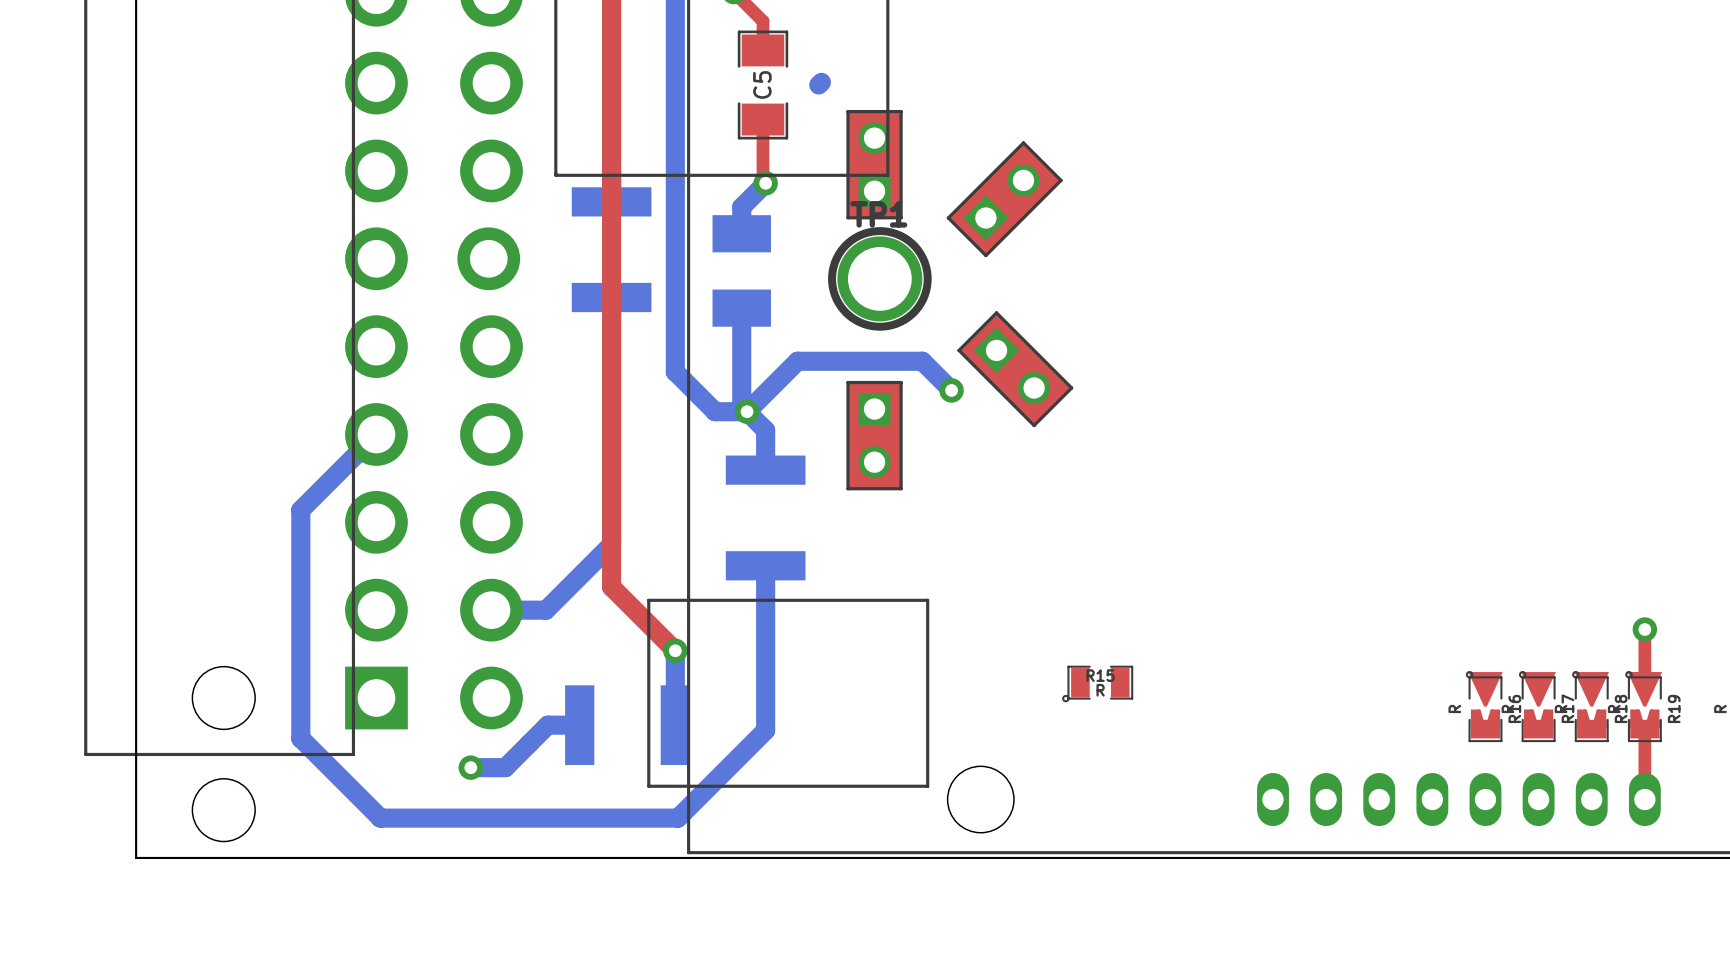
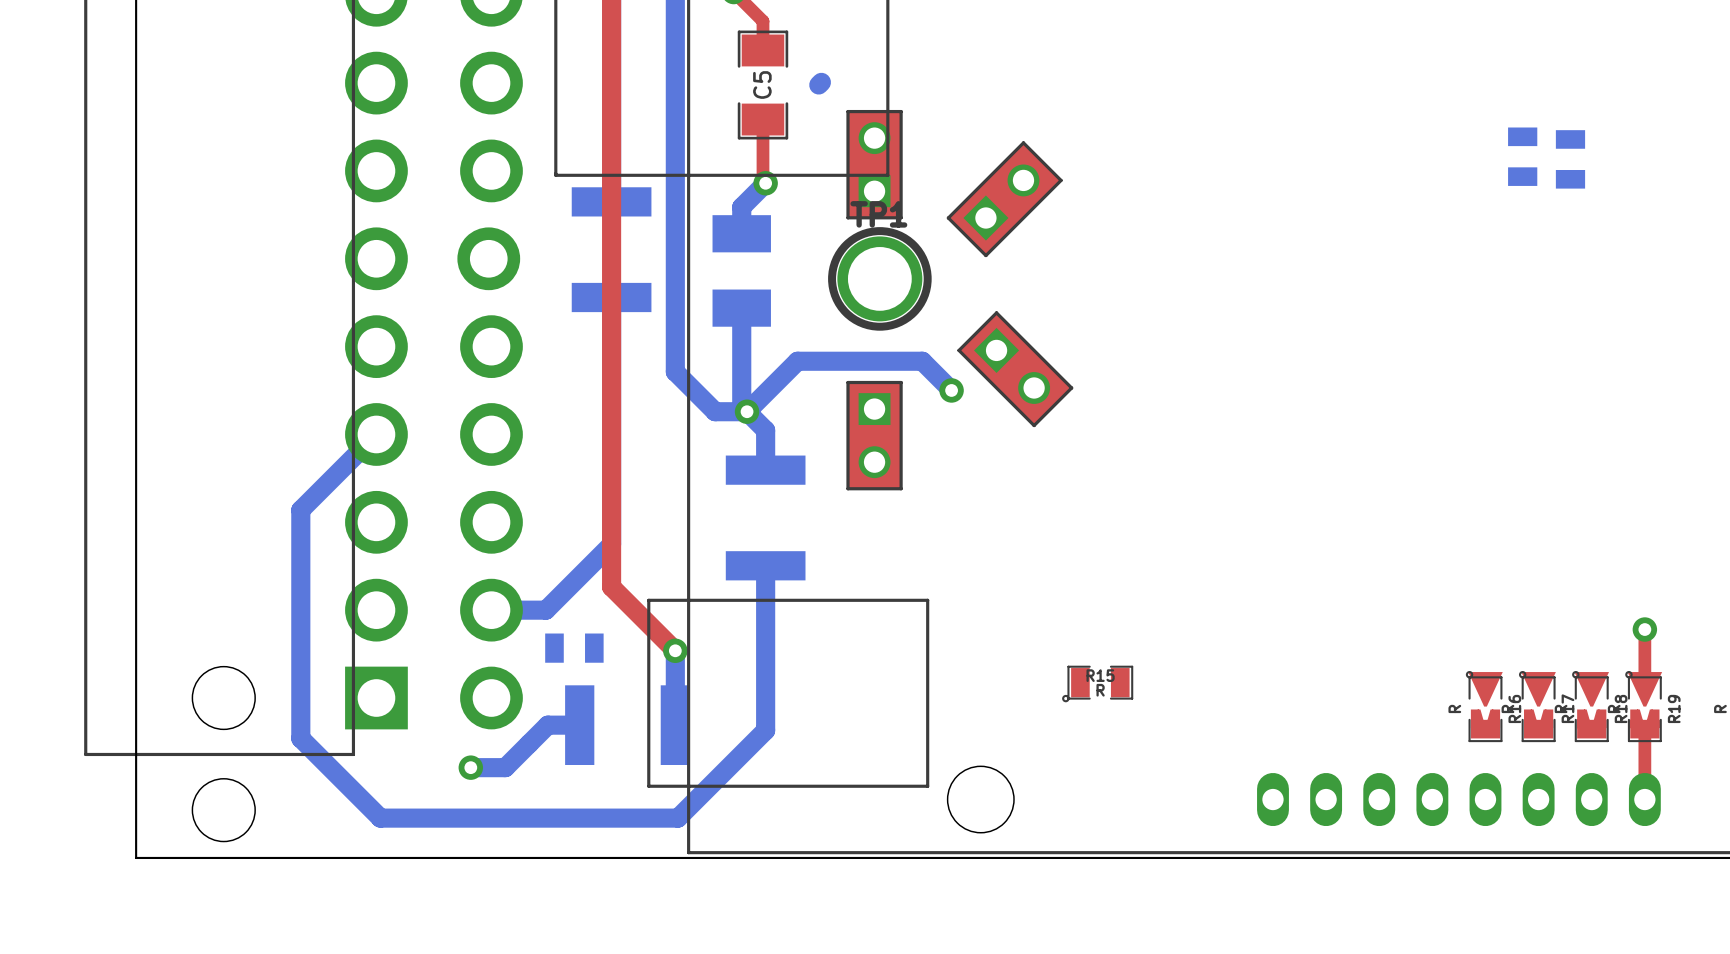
part: none -> (1522, 156)
part: none -> (1570, 159)
part: none -> (574, 648)

